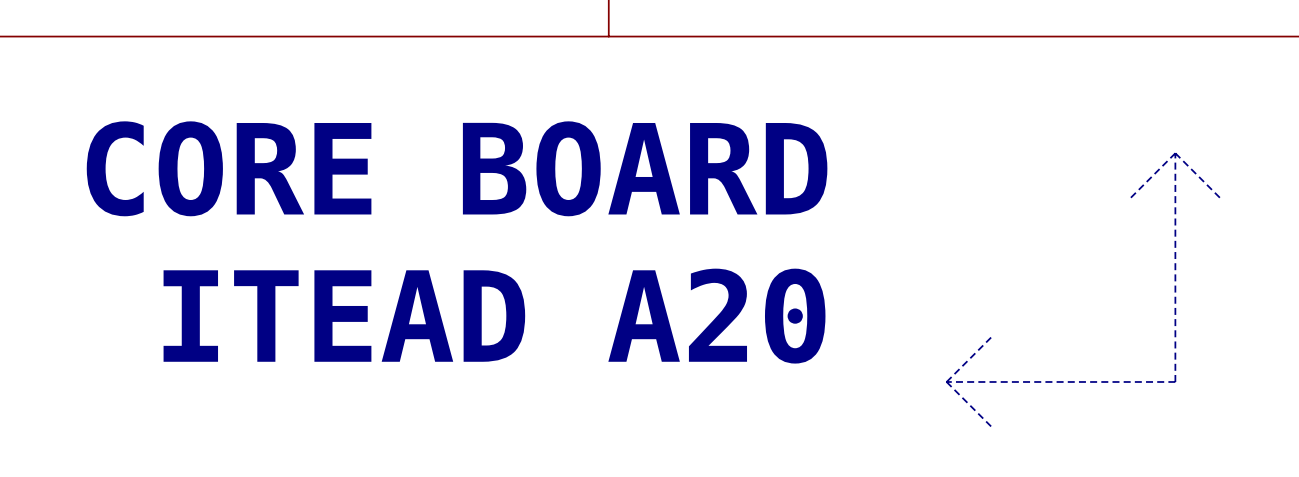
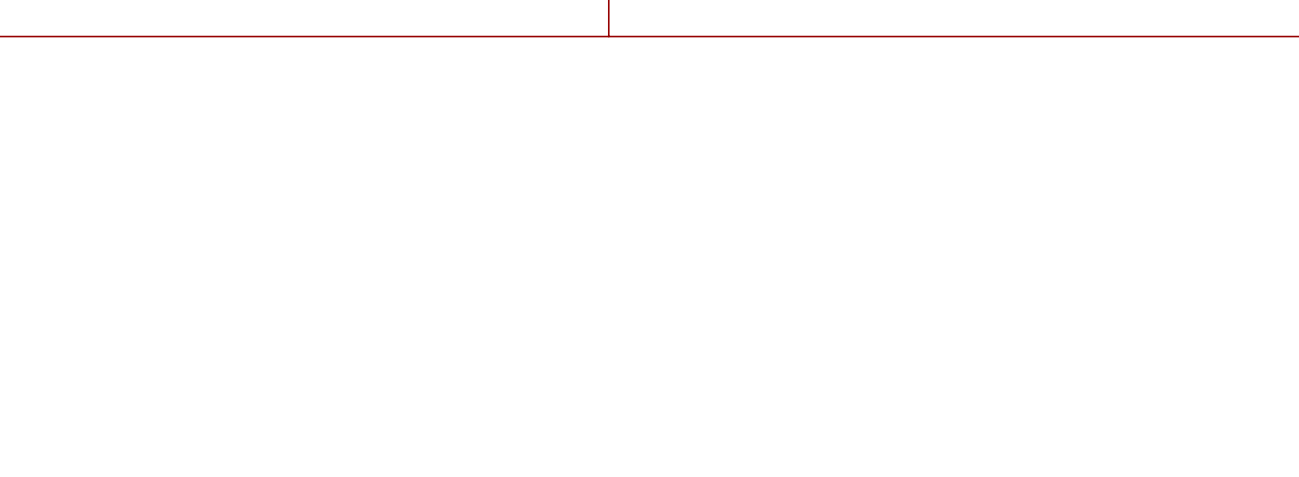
line: (1175, 153) (1175, 381) (946, 381) -> none
line: (1175, 153) (1129, 199) -> none
line: (1175, 153) (1221, 199) -> none
text: CORE BOARD (457, 168) -> none
text: ITEAD A20 (494, 316) -> none
line: (992, 336) (946, 381) -> none
line: (946, 381) (992, 427) -> none

